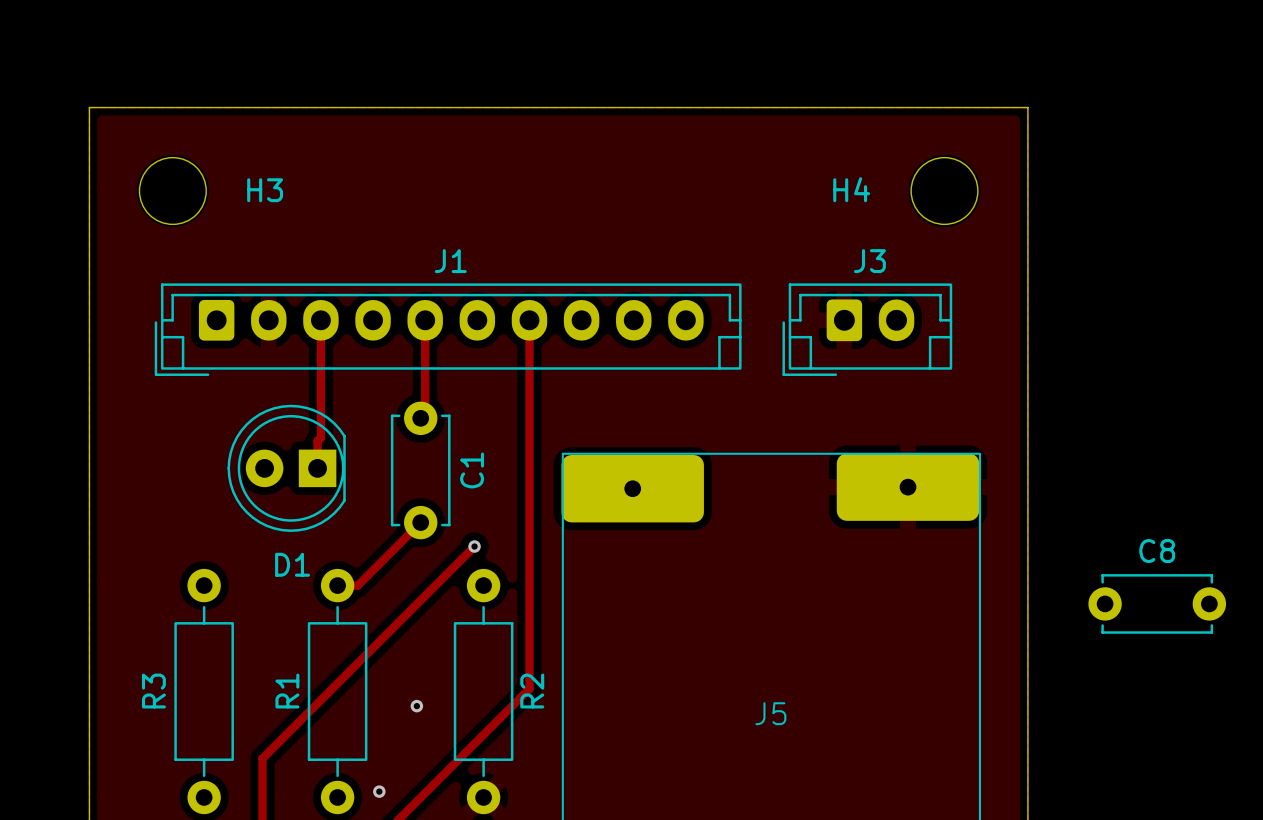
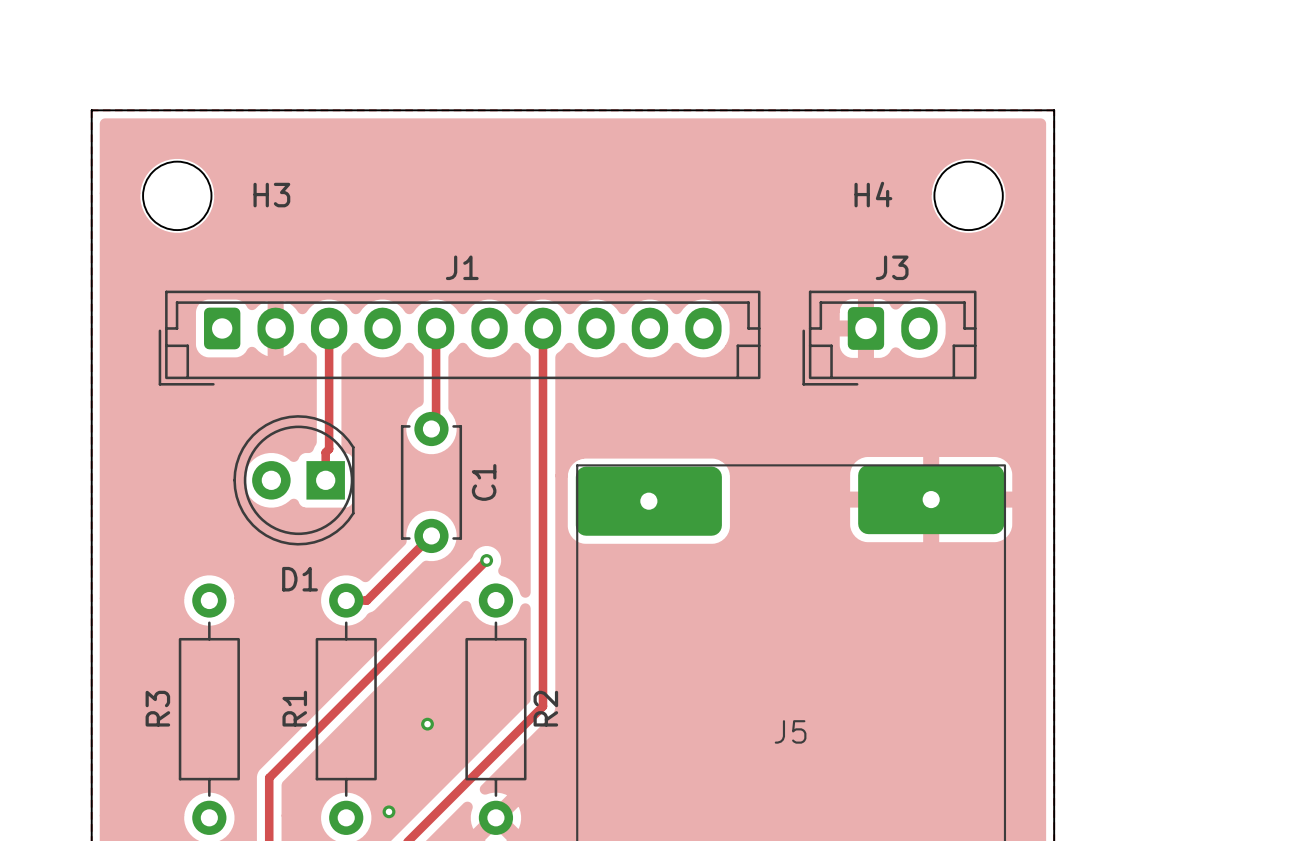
C8: (1157, 603) -> none

